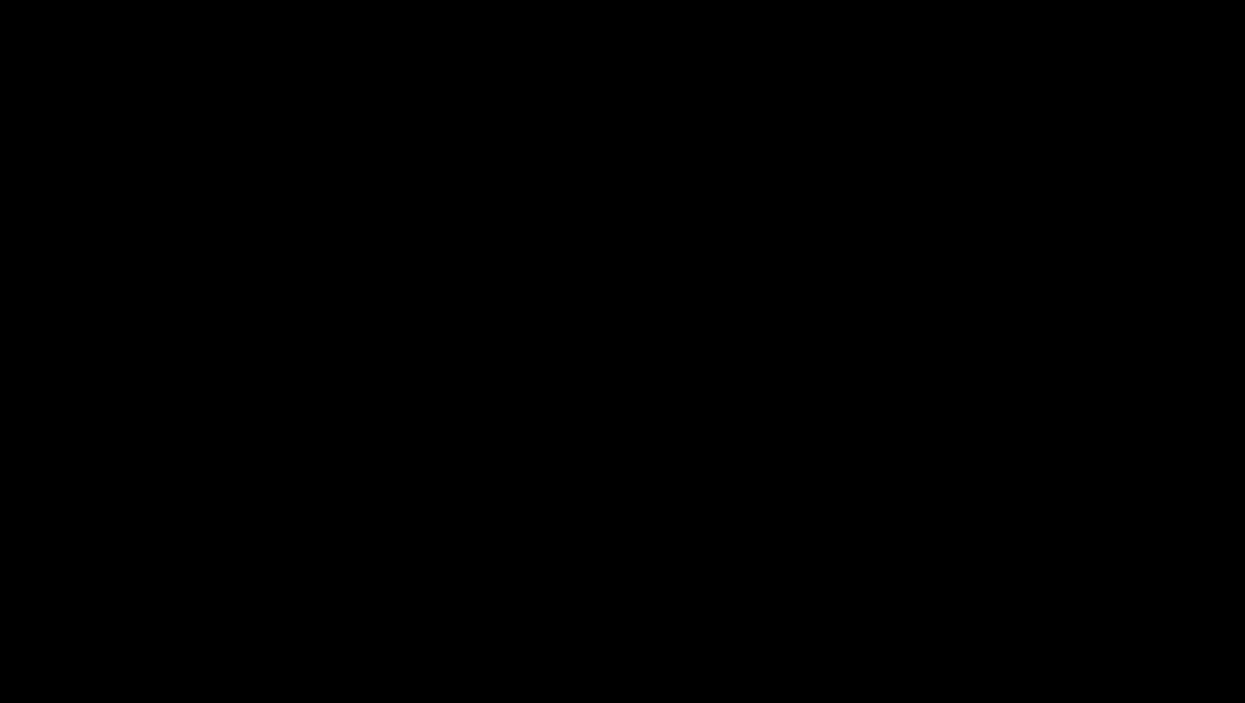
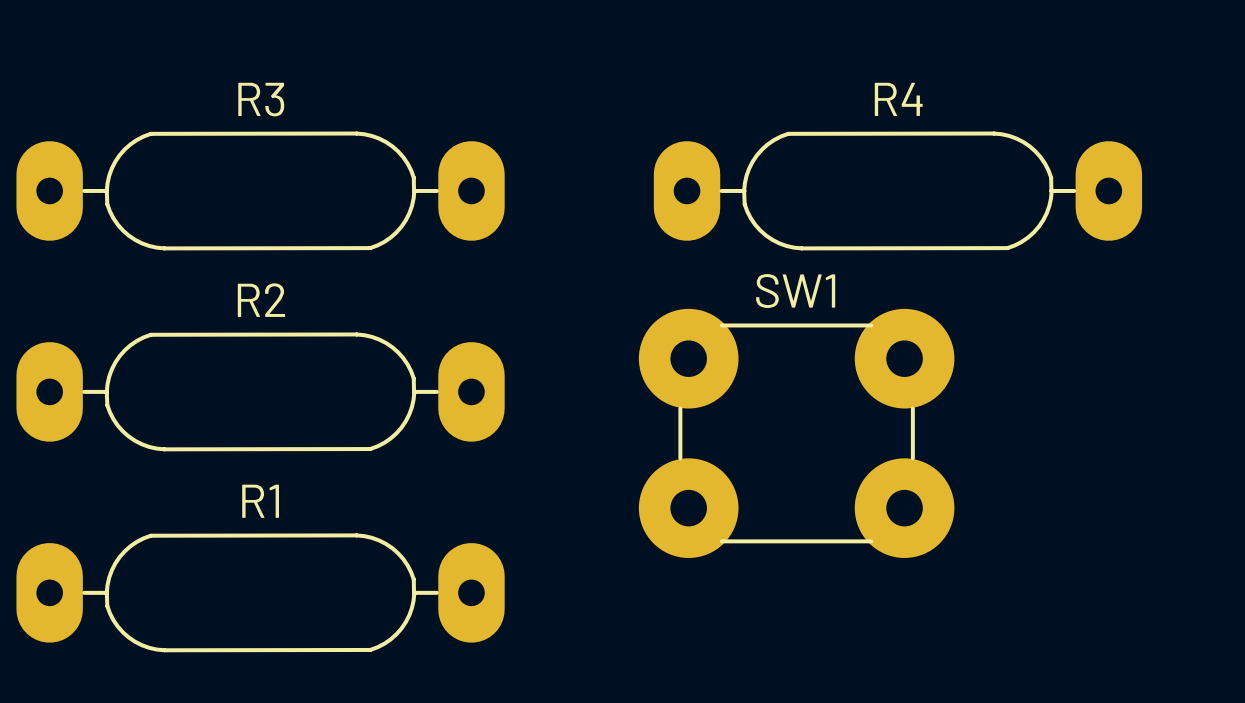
R3: none -> (260, 190)
R4: none -> (897, 190)
R2: none -> (260, 391)
SW1: none -> (796, 433)
R1: none -> (260, 592)

